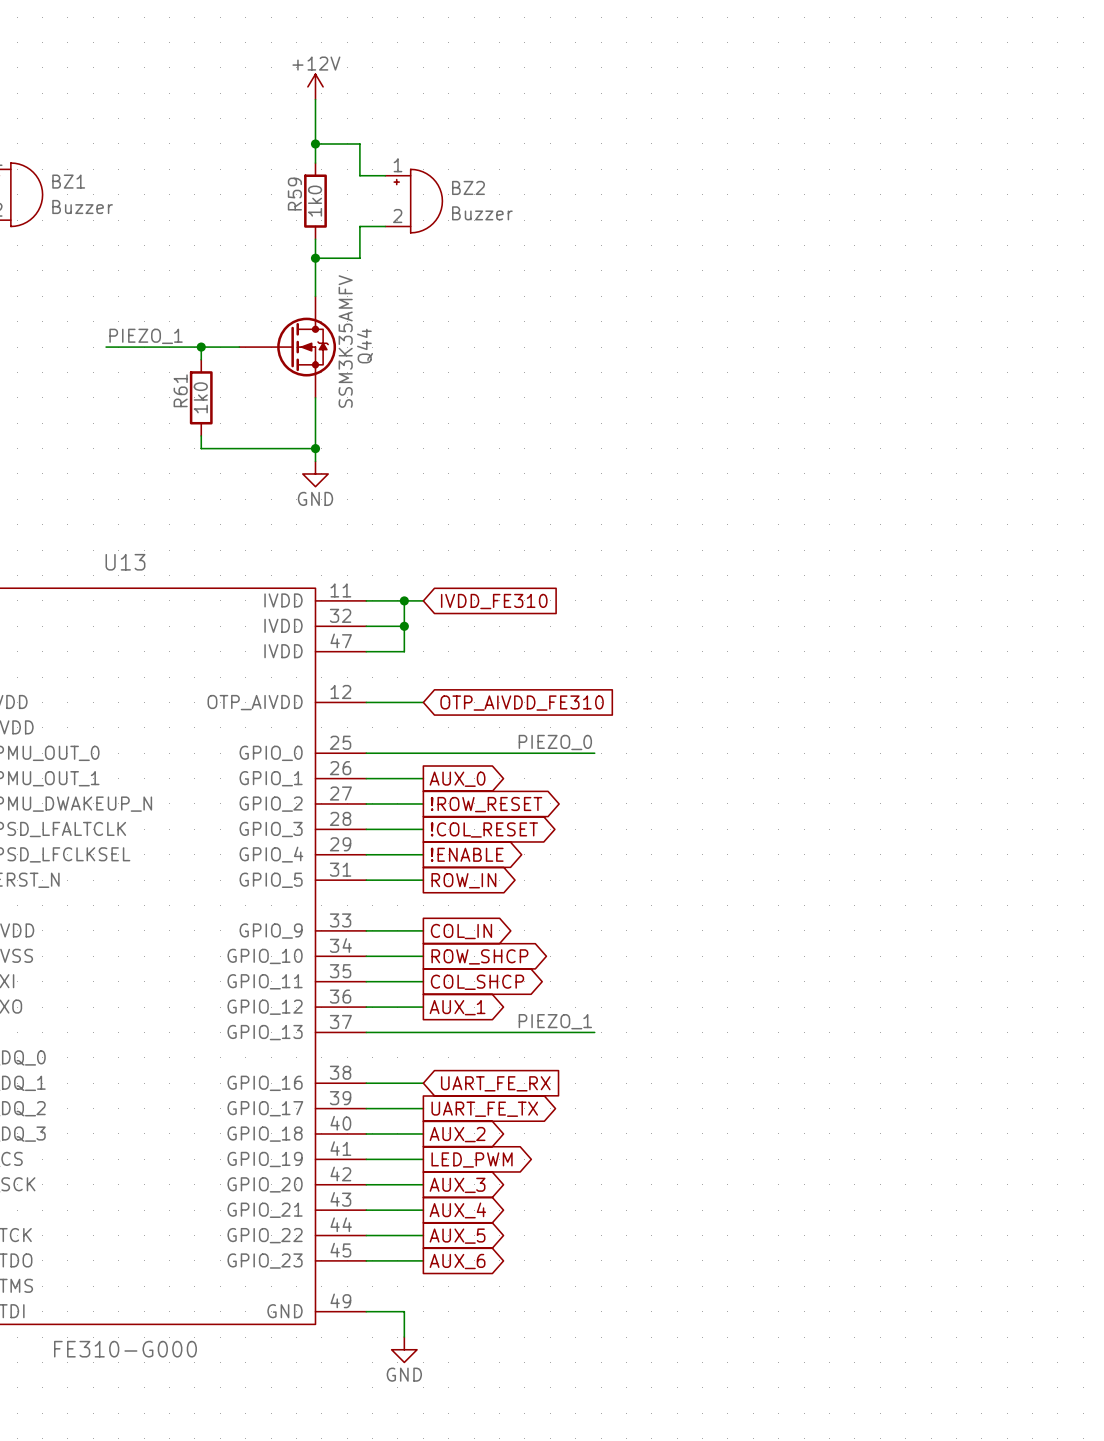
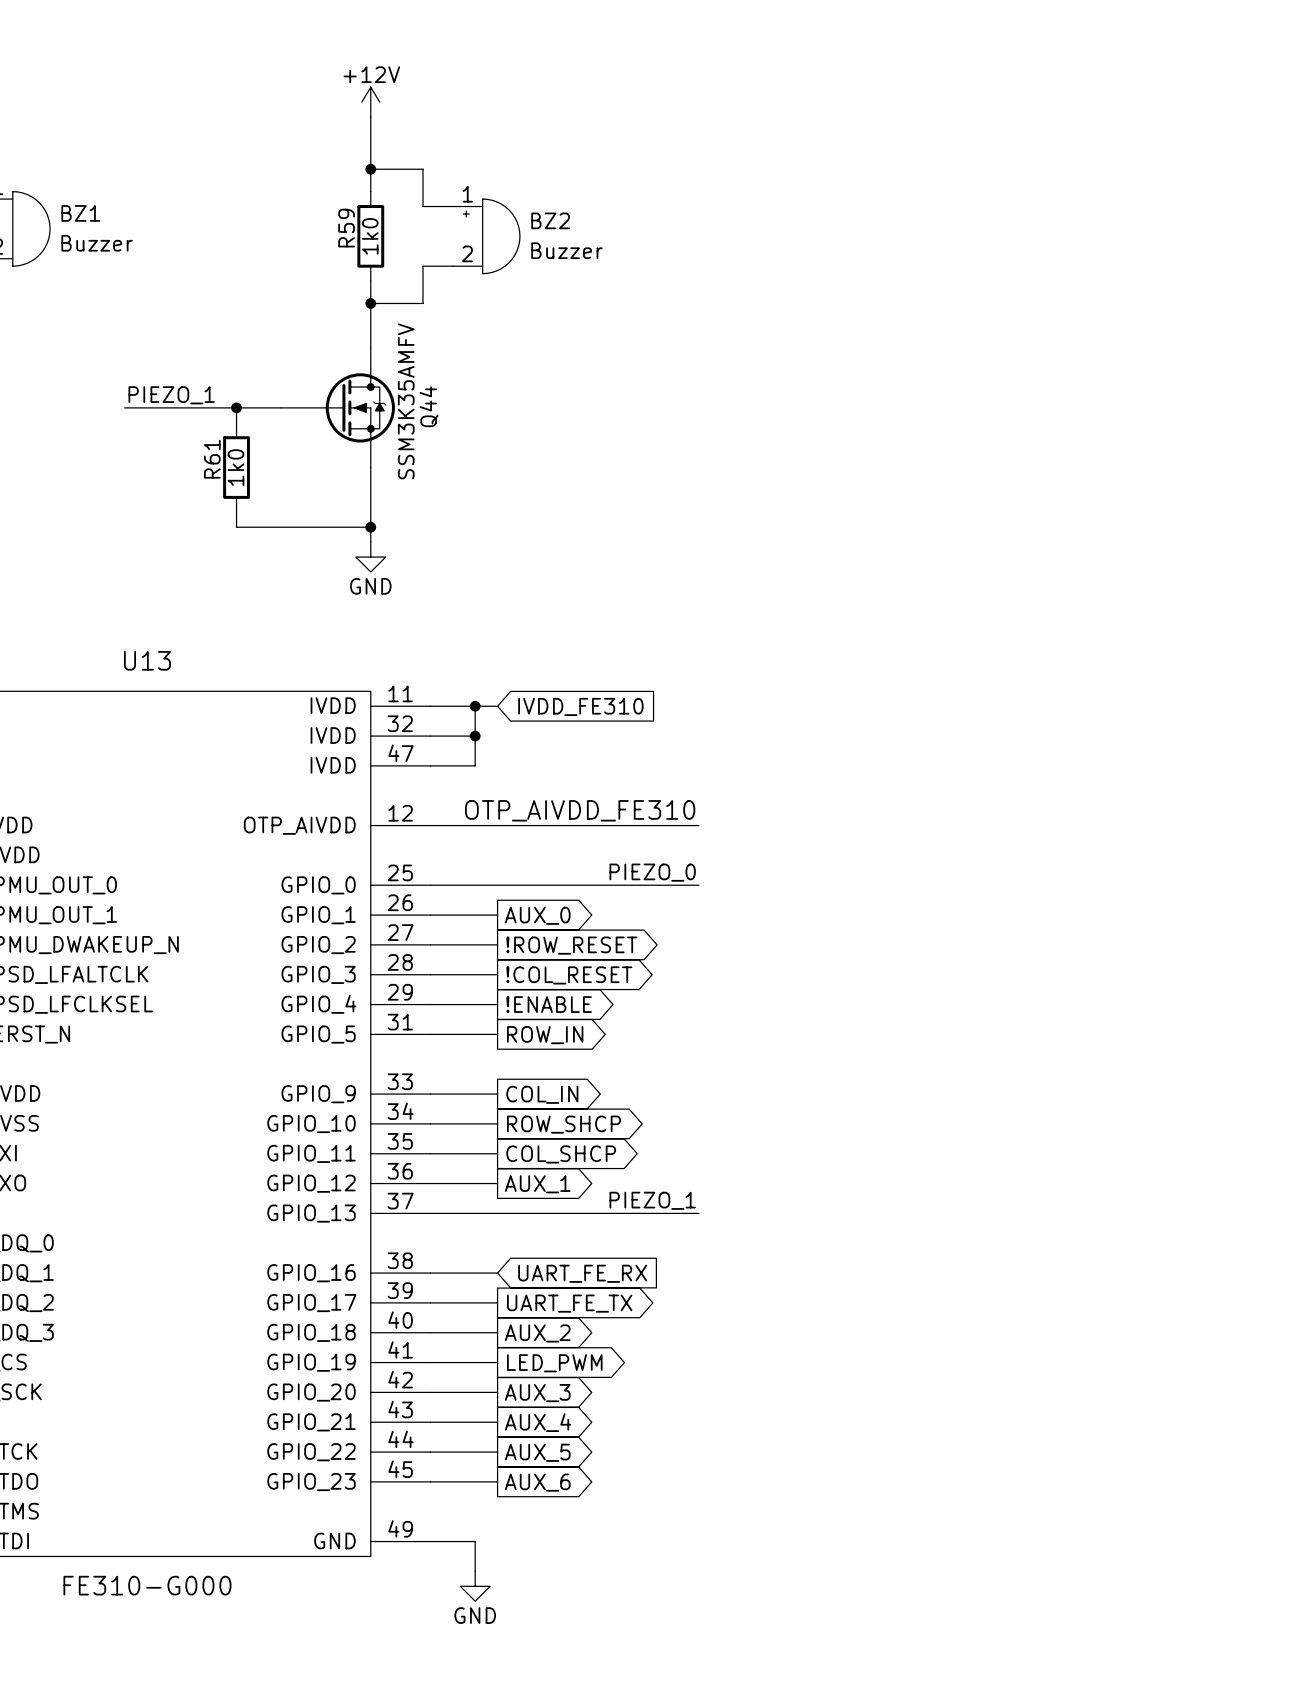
label: none -> OTP_AIVDD_FE310 (580, 810)
wire: none -> (497, 825) (698, 825)
global label: OTP_AIVDD_FE310 (522, 703) -> none

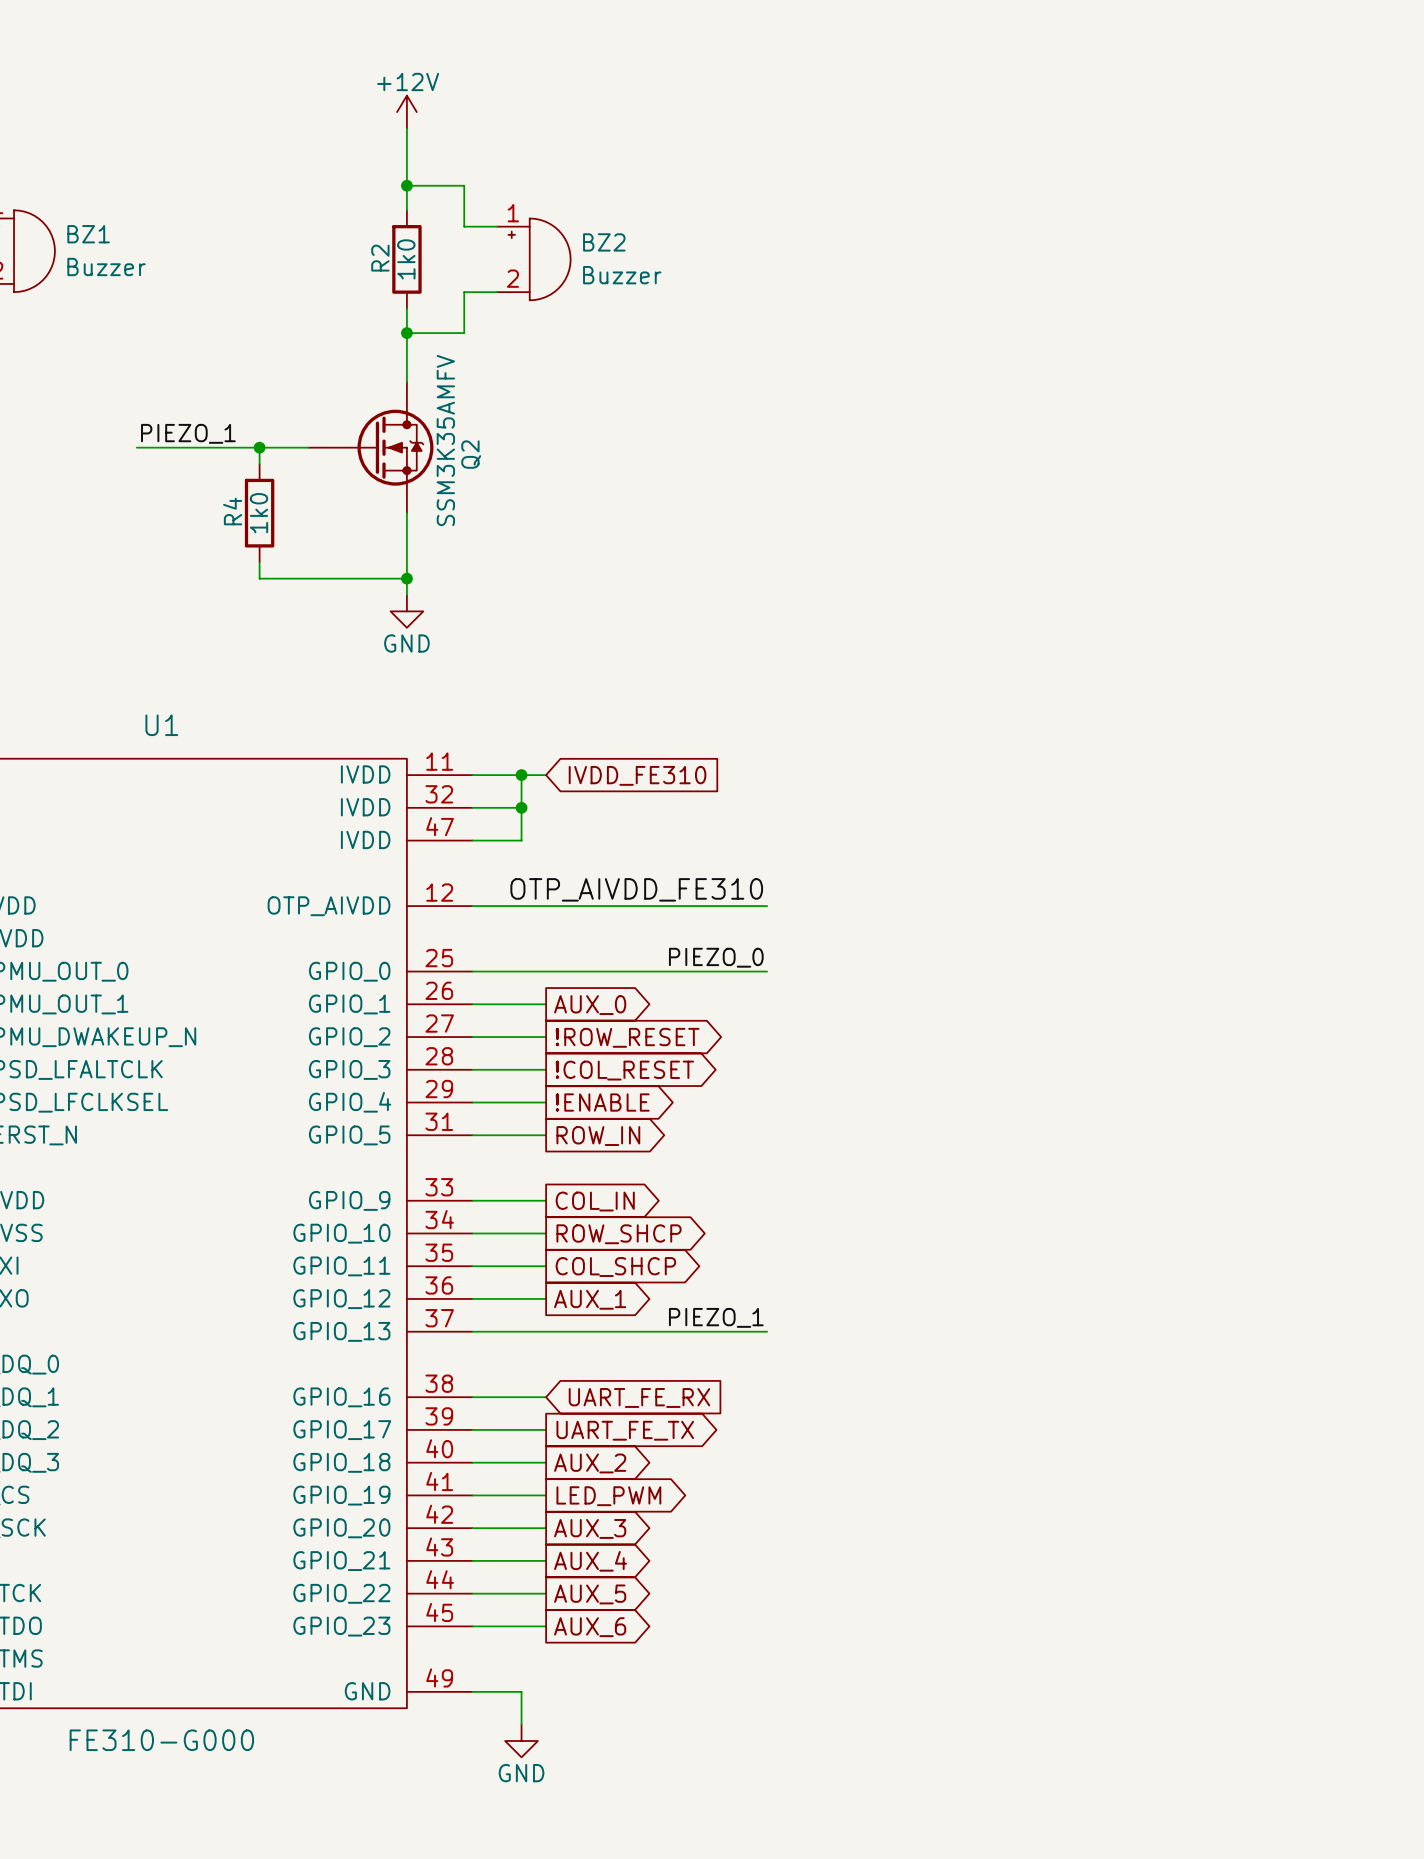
R59 name: R59 (346, 228) -> R2 (380, 258)
Q44 name: Q44 (428, 406) -> Q2 (471, 454)
R61 name: R61 (212, 459) -> R4 (232, 511)
U13 name: U13 (147, 660) -> U1 (161, 725)

